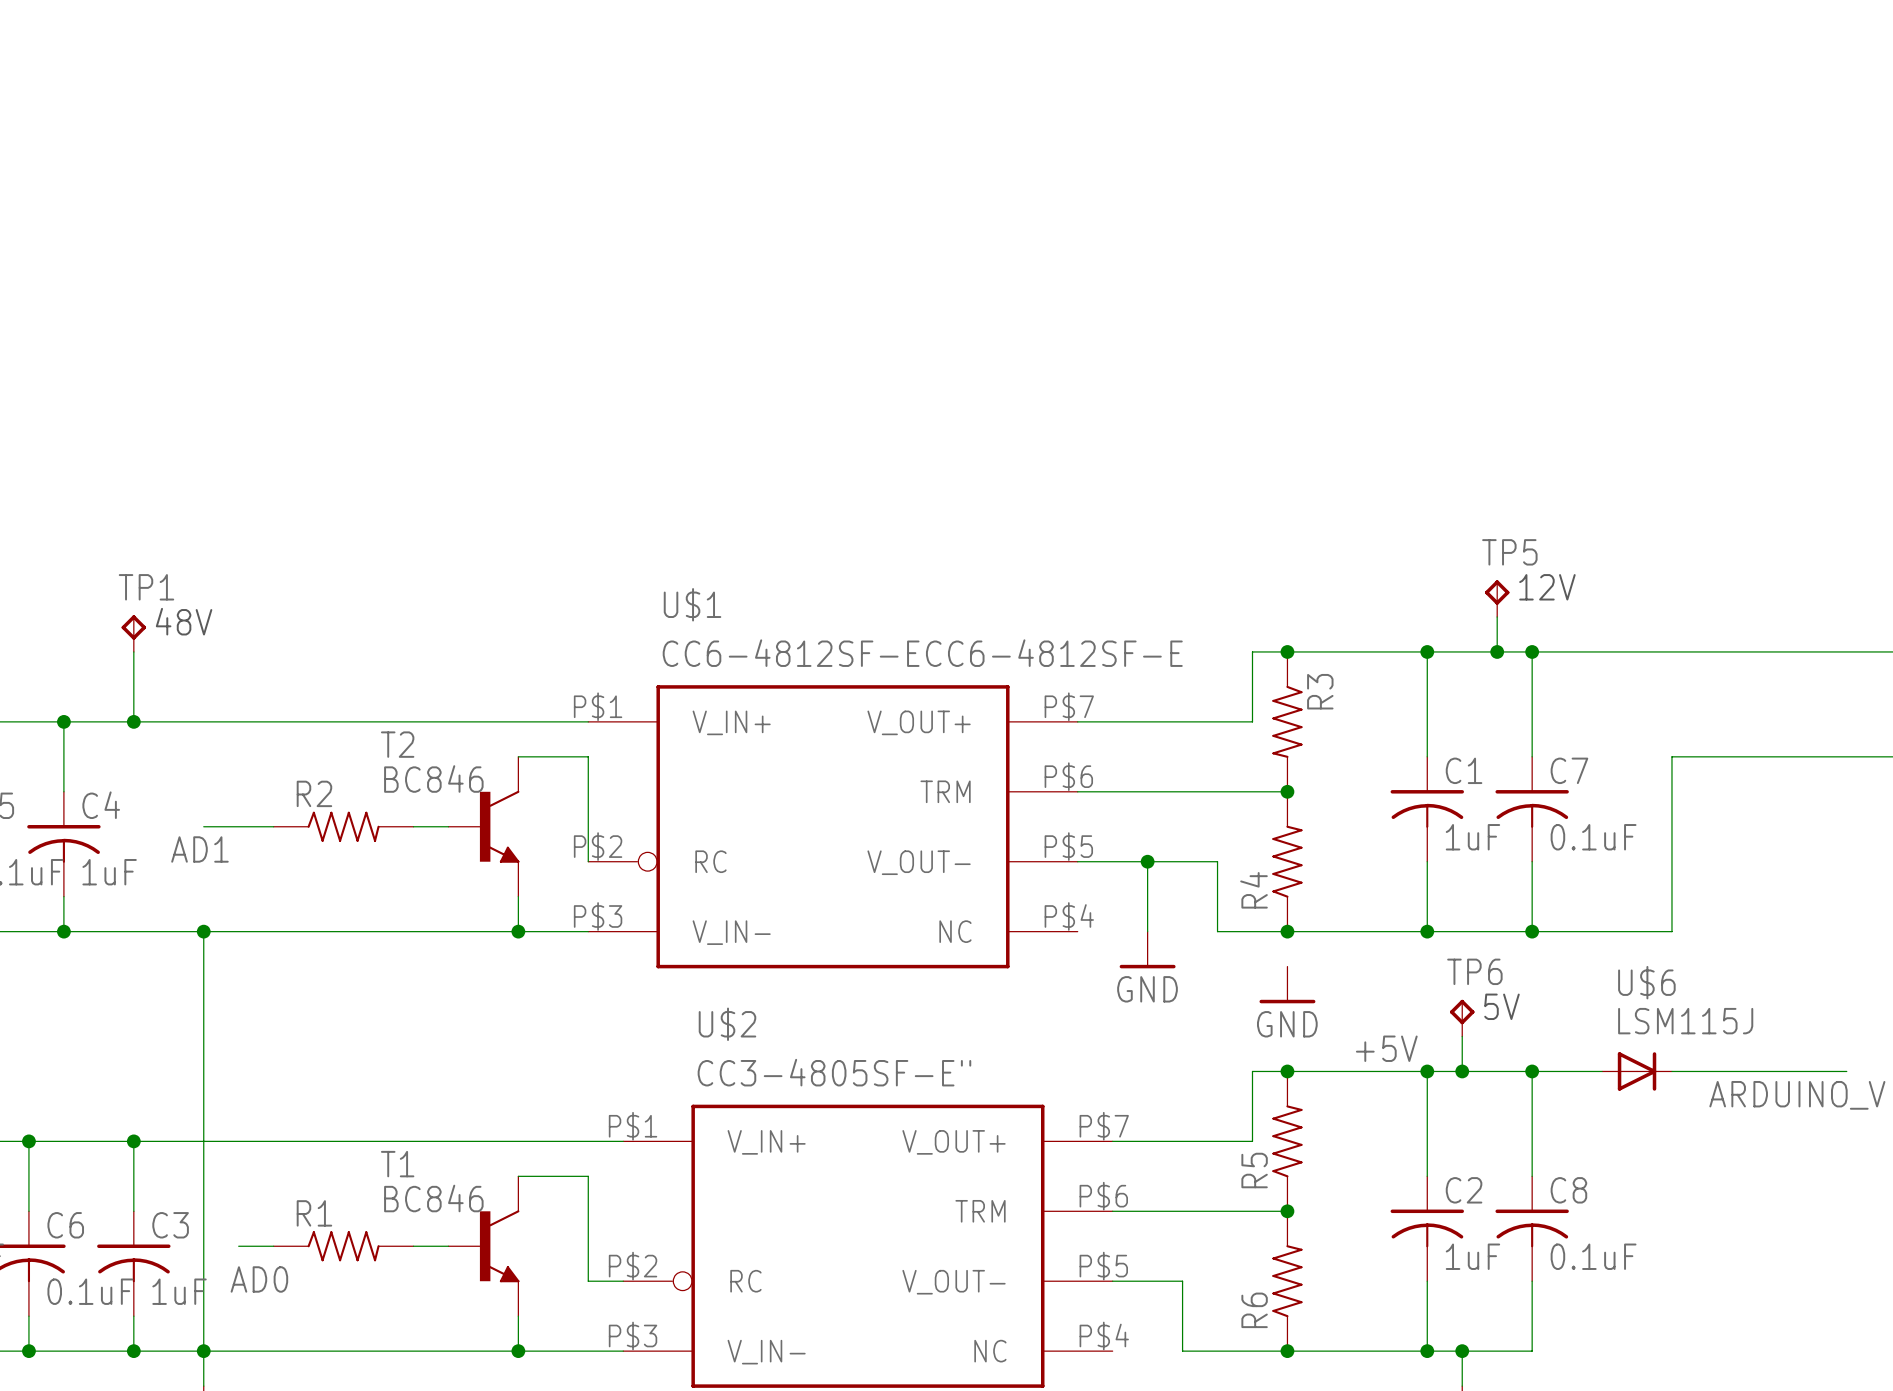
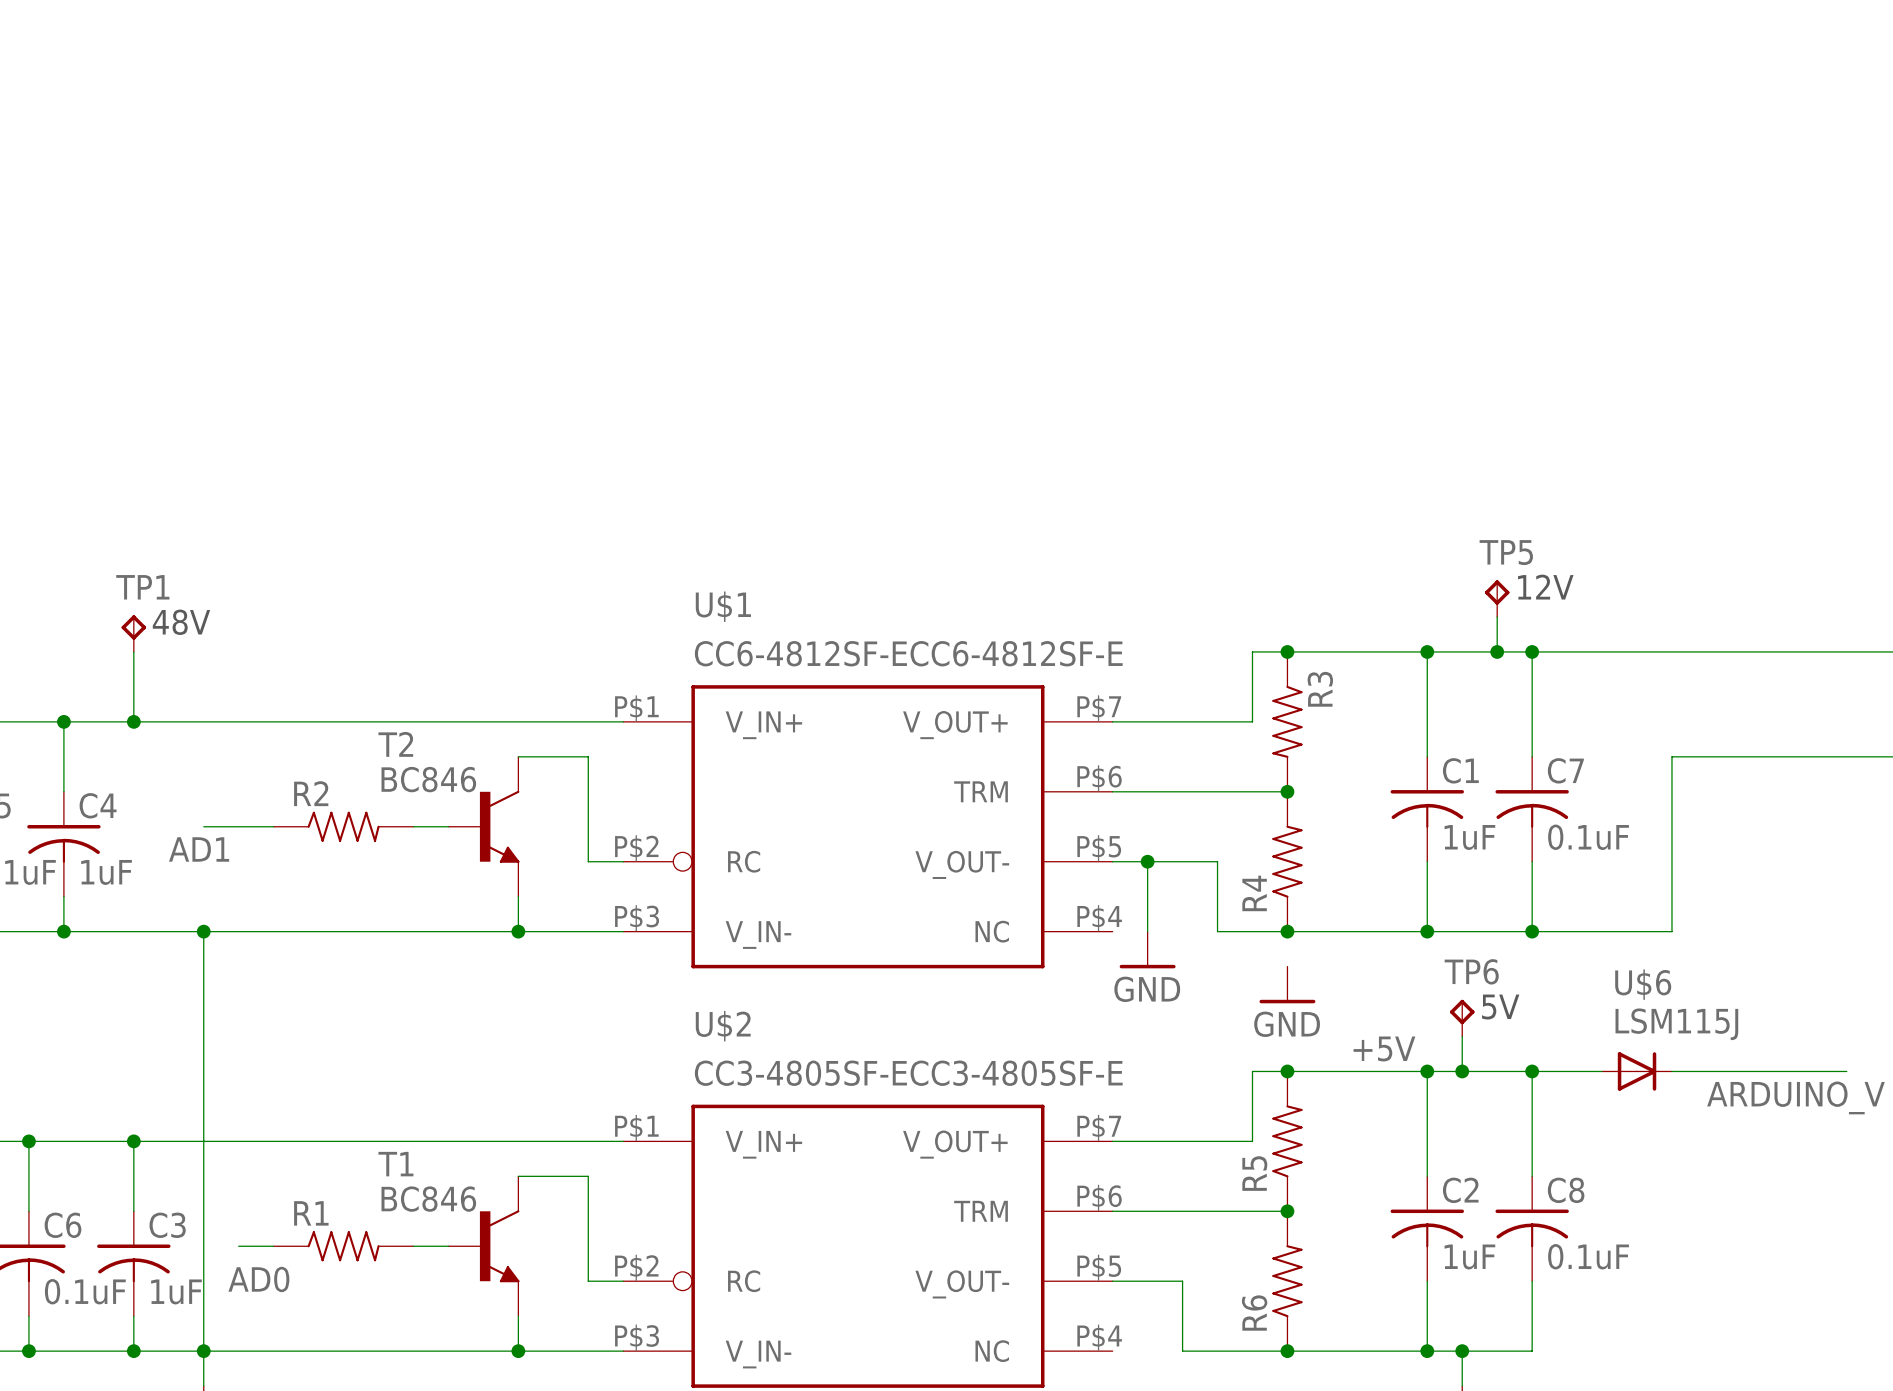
U$1 position: (832, 826) -> (867, 826)
U$2 value: CC3-4805SF-E" (834, 1072) -> CC3-4805SF-ECC3-4805SF-E (908, 1073)

